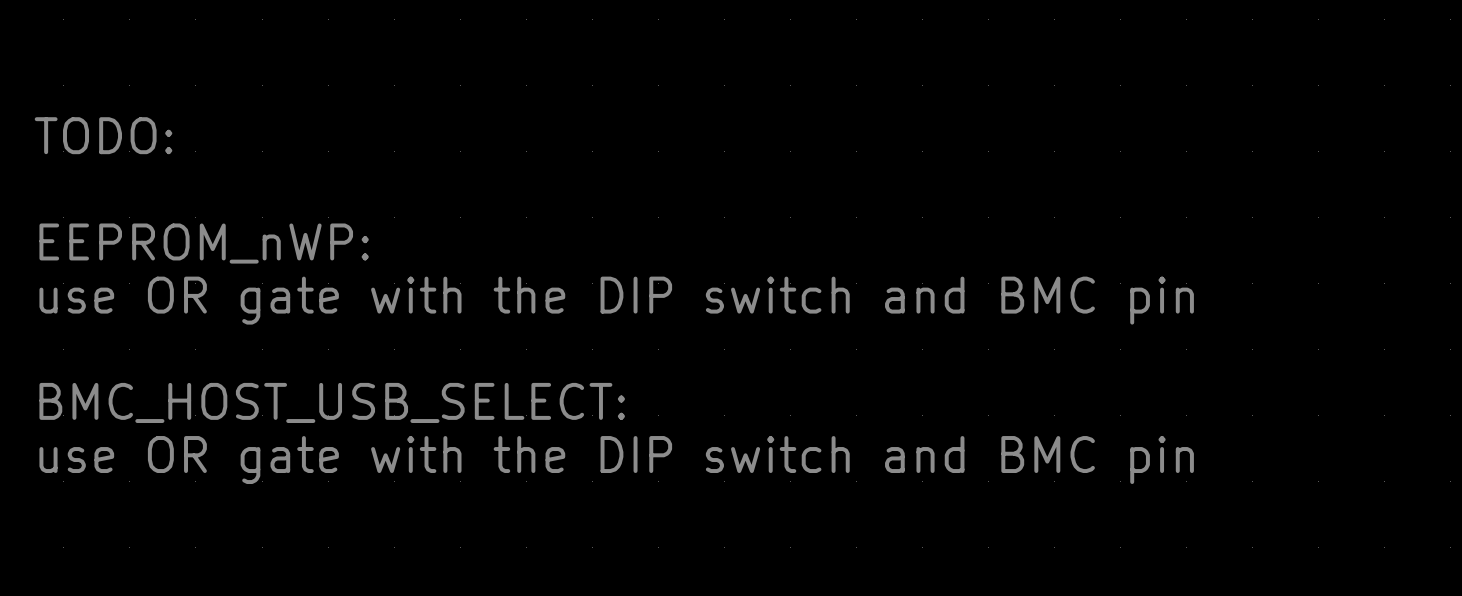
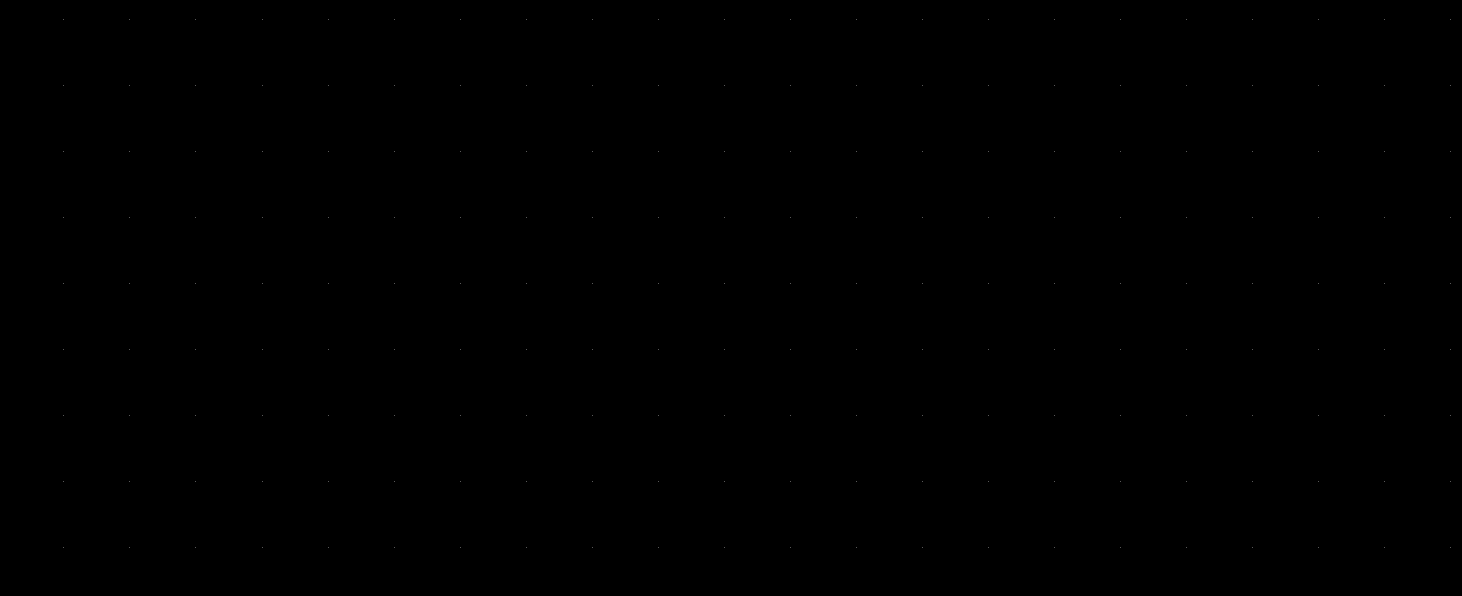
text: TODO: (103, 135) -> none
text: EEPROM_nWP: (204, 243) -> none
text: use OR gate with the DIP switch and BMC pin (616, 300) -> none
text: BMC_HOST_USB_SELECT: (332, 402) -> none
text: use OR gate with the DIP switch and BMC pin (616, 460) -> none

